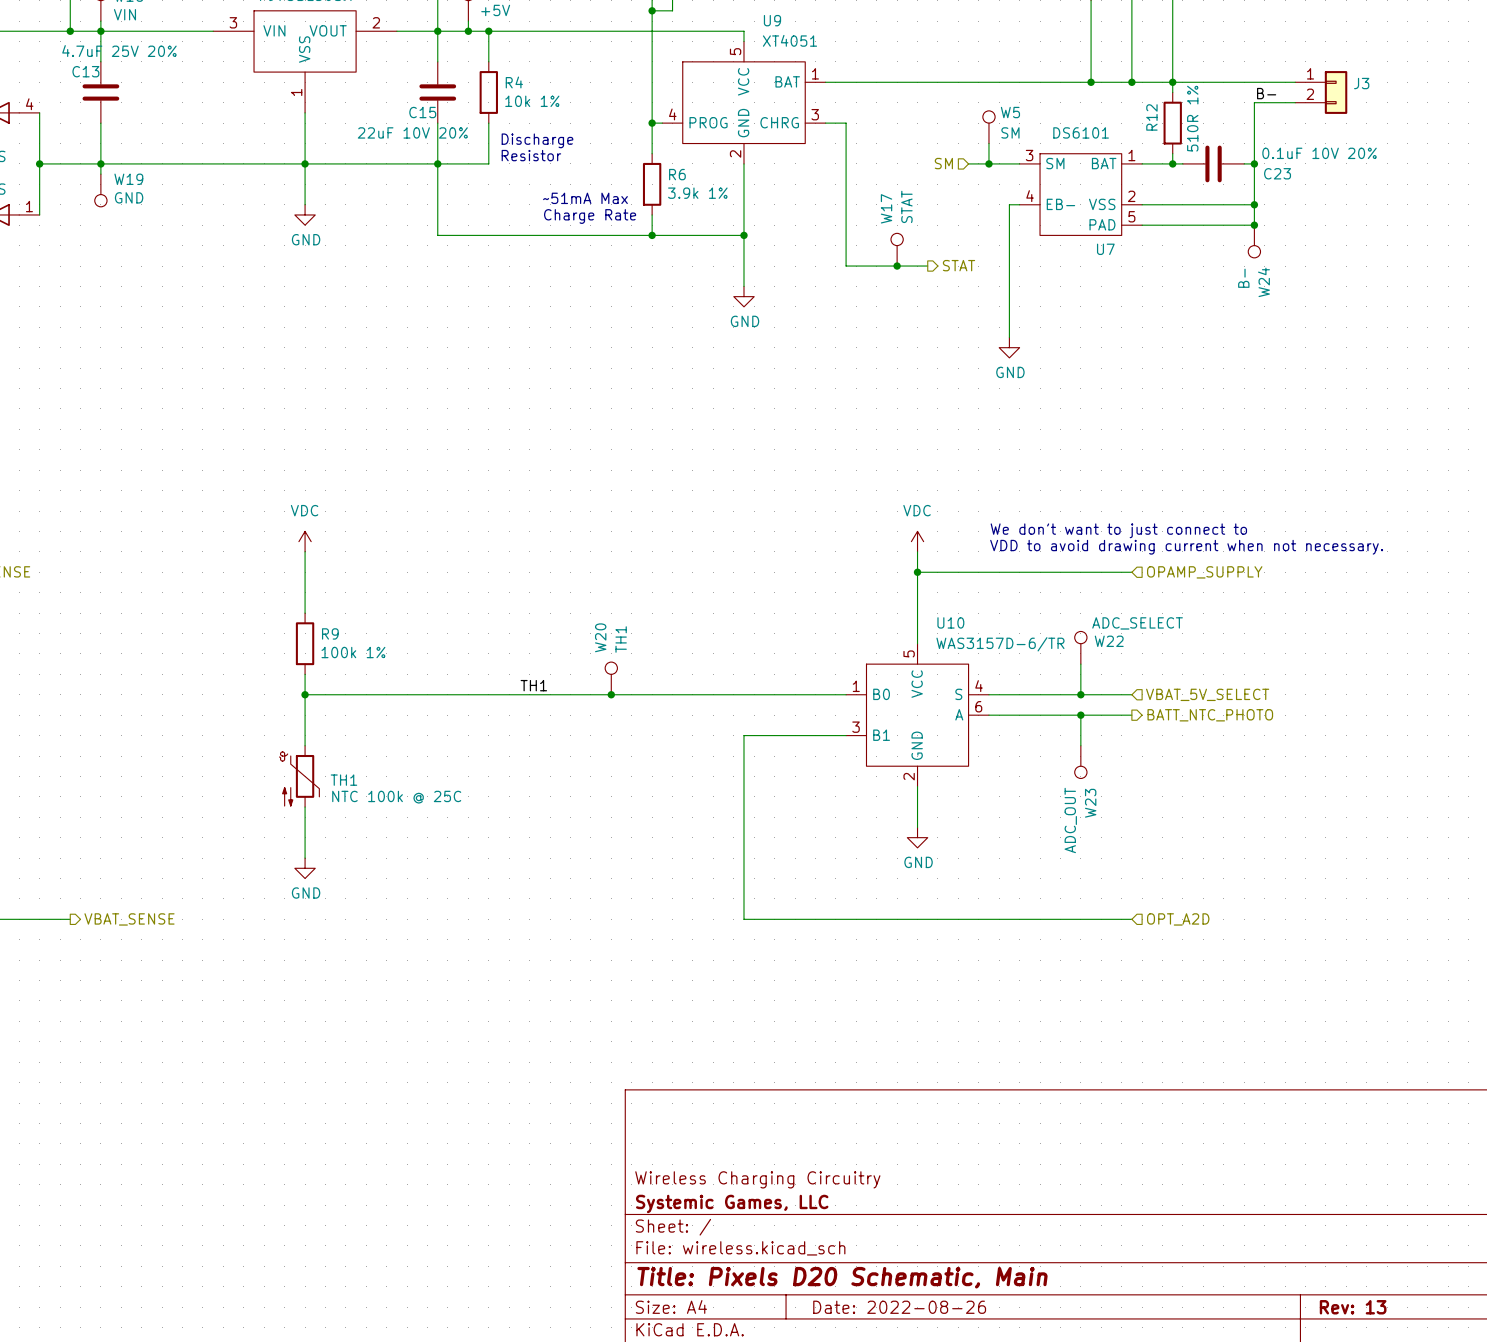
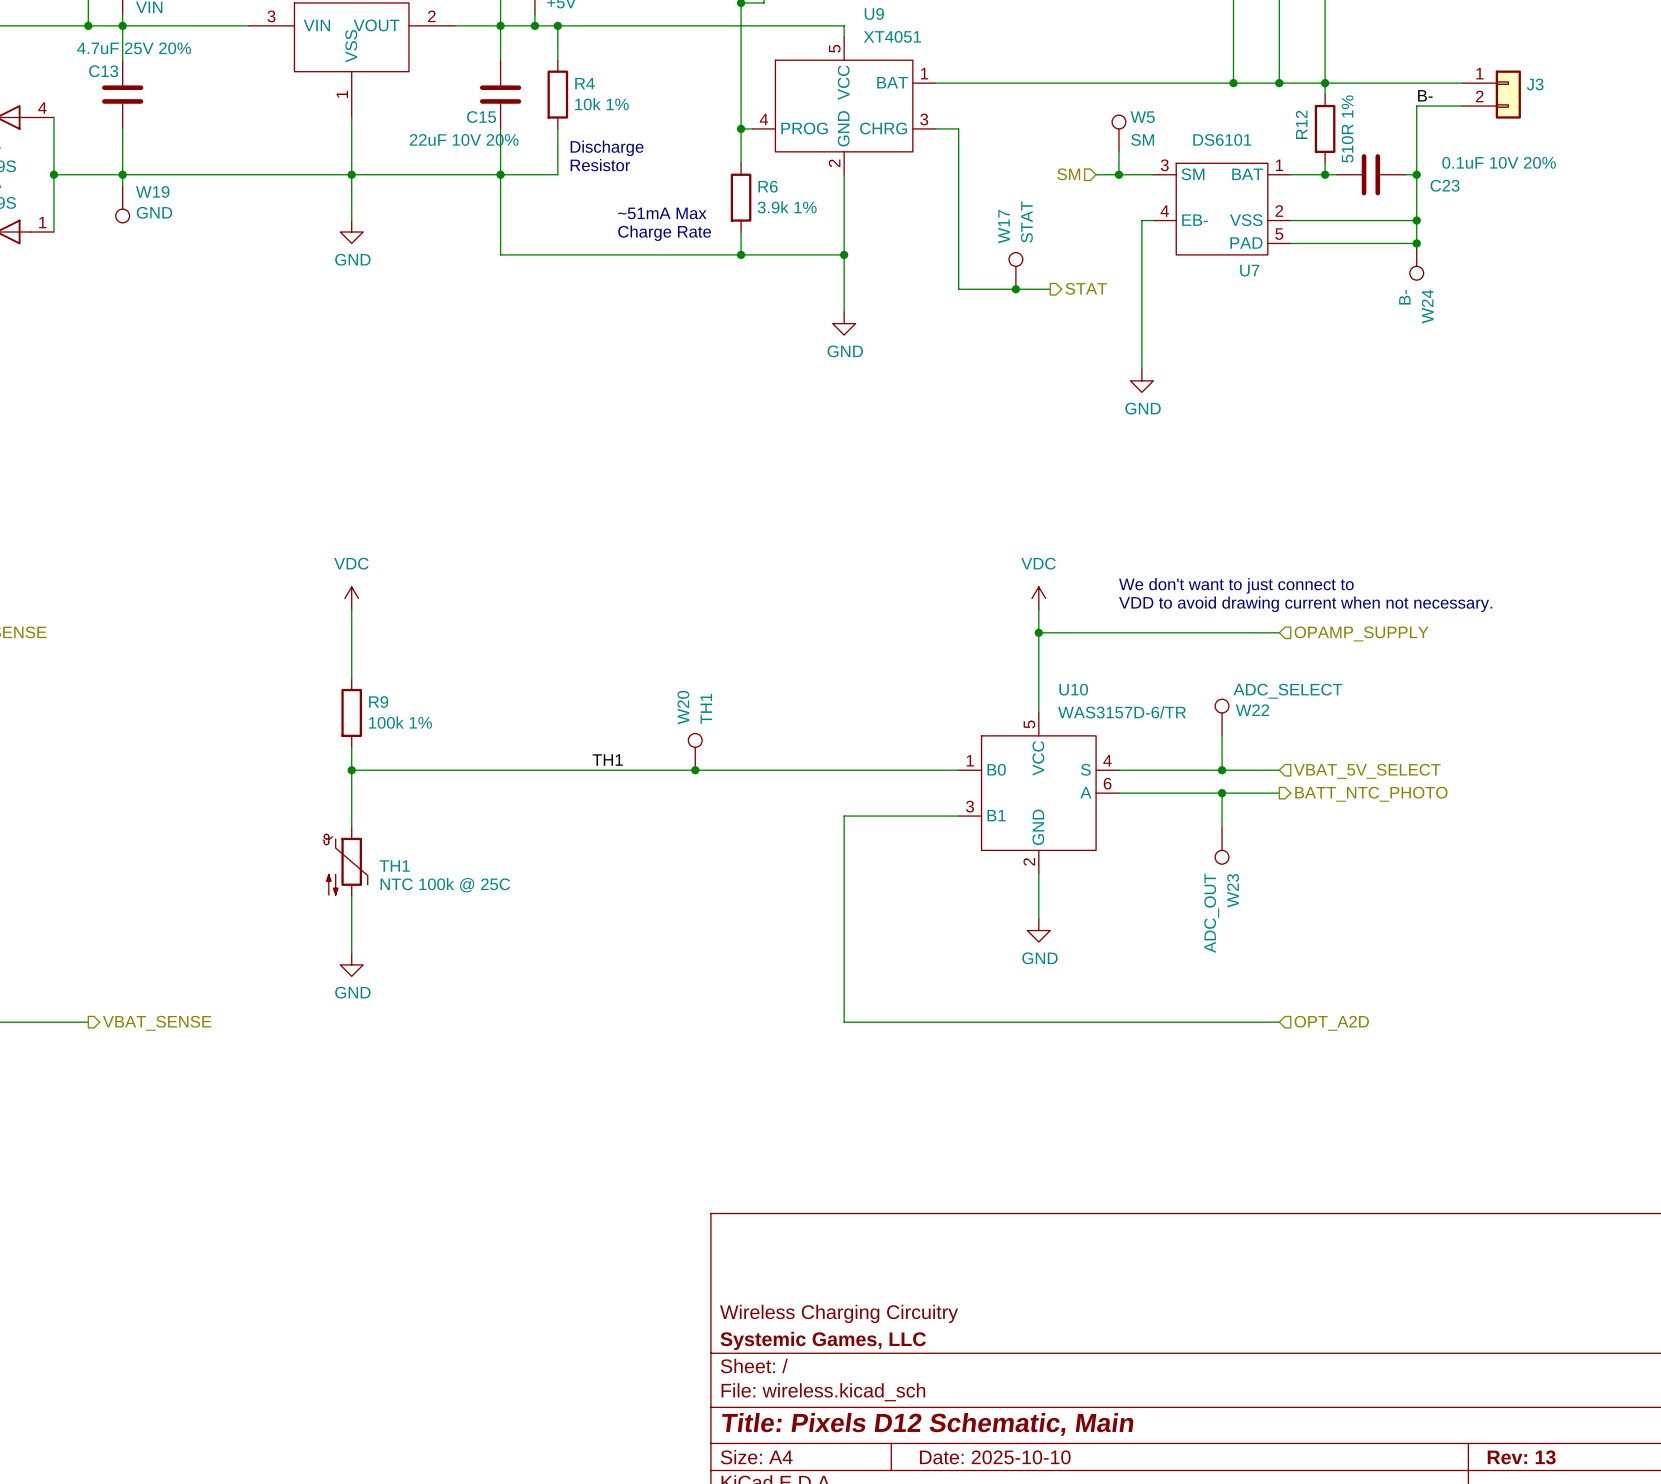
title block: Title: Pixels D20 Schematic, Main (842, 1277) -> Title: Pixels D12 Schematic, Main (927, 1424)
title block: Date: 2022-08-26 (899, 1307) -> Date: 2025-10-10 (995, 1457)

